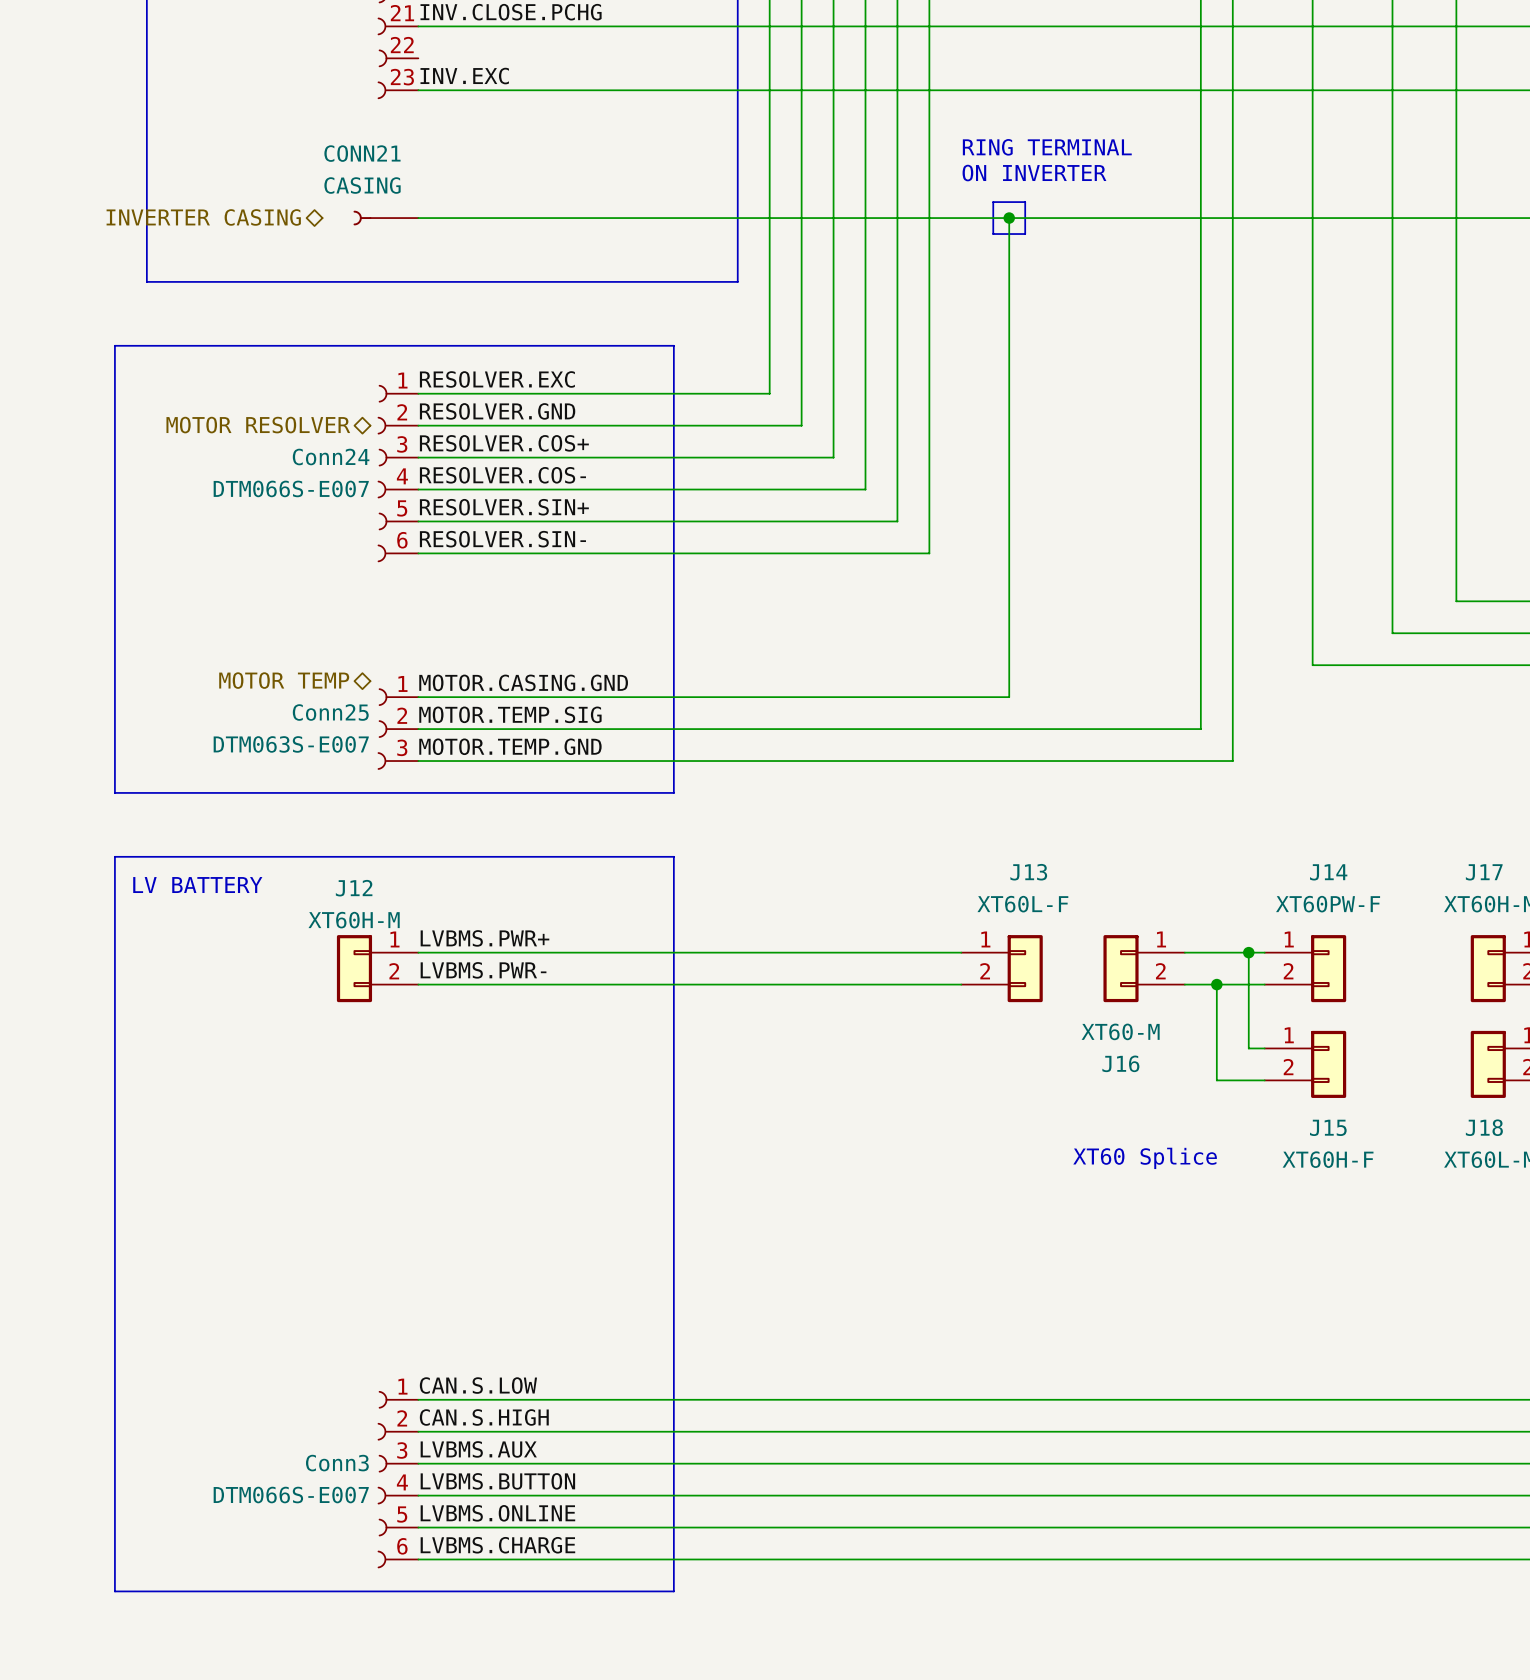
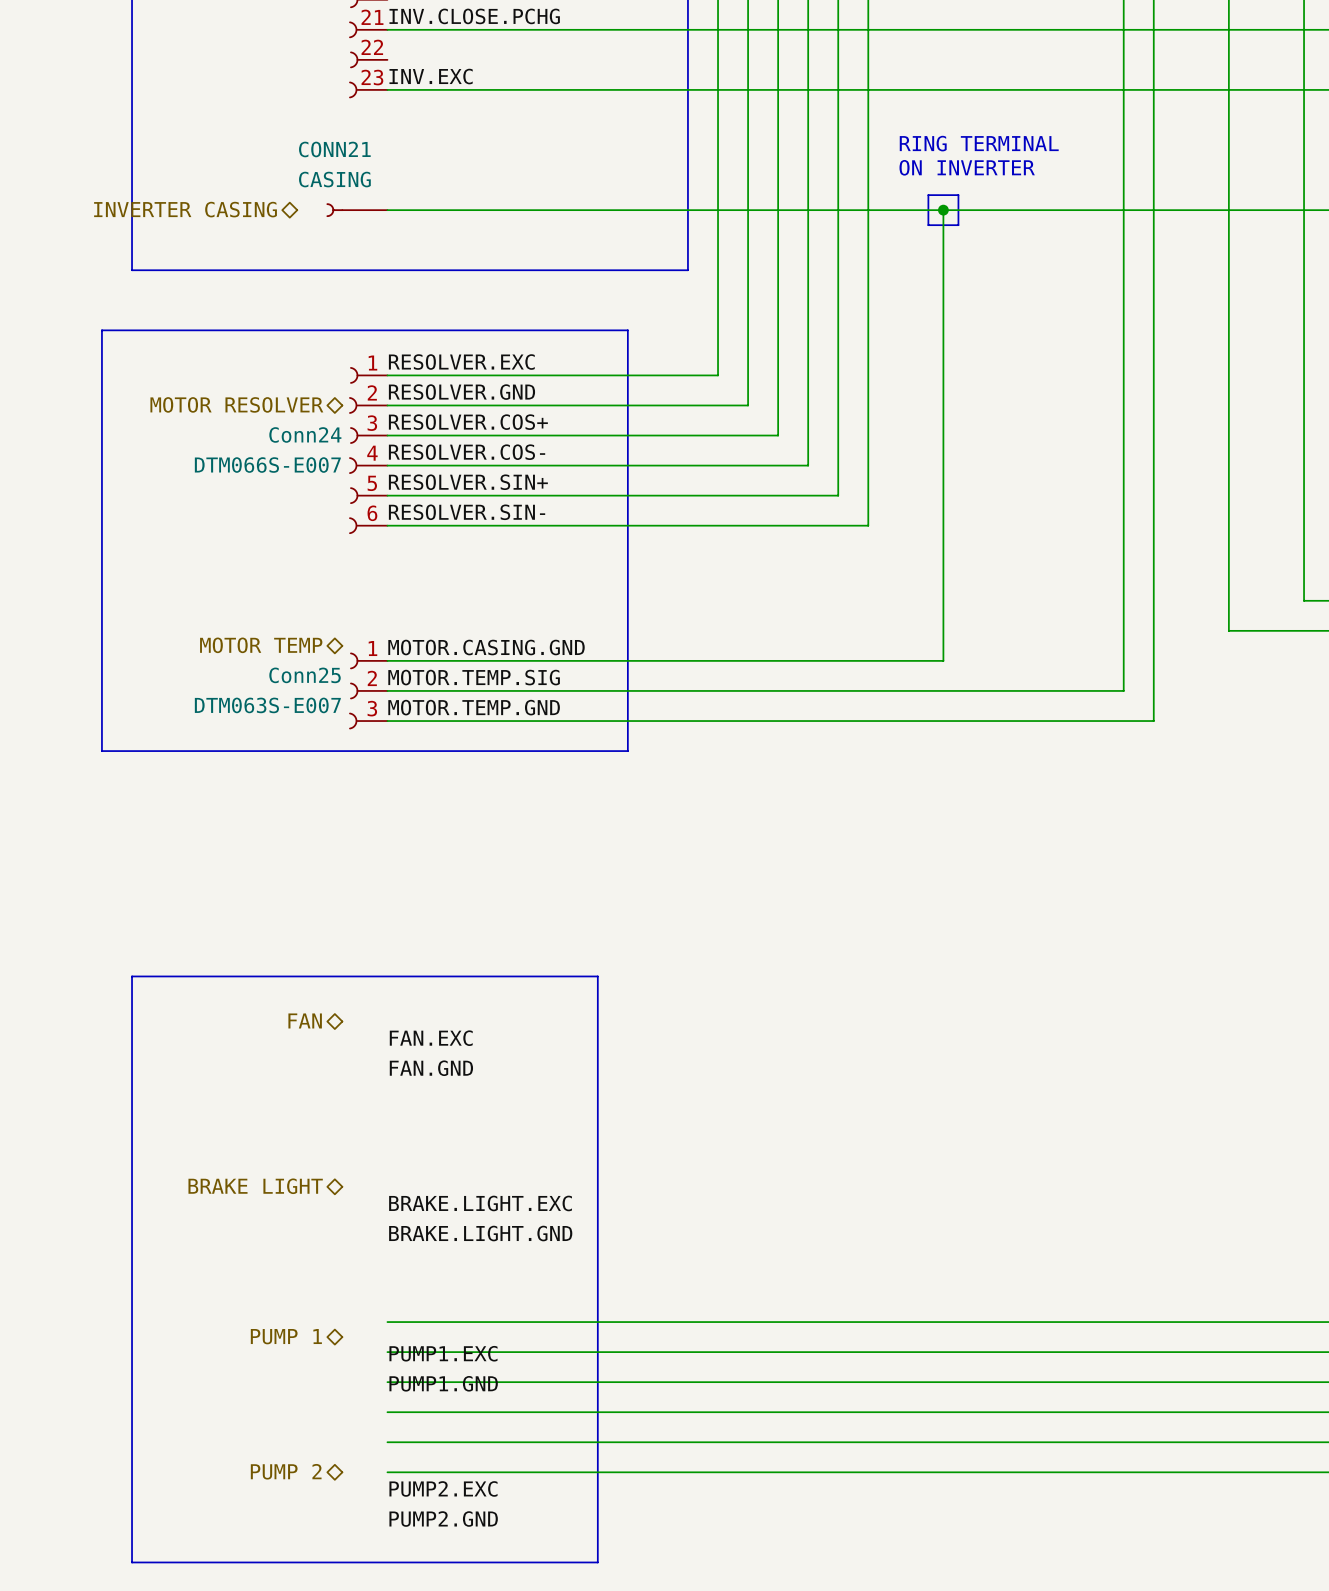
line: (114, 856) (114, 1591) (673, 1591) (673, 856) (114, 856) -> (132, 976) (132, 1562) (597, 1562) (597, 976) (132, 976)
text: LV BATTERY (197, 885) -> none
label: LVBMS.PWR+ (484, 938) -> none
wire: (418, 952) (961, 952) -> none
wire: (1184, 952) (1264, 952) -> none
wire: (1248, 952) (1248, 1048) (1264, 1048) -> none
junction: (1248, 952) -> none
J12: XT60H-M (377, 968) -> none
J13: XT60L-F (1002, 968) -> none
J16: XT60-M (1144, 968) -> none
J14: XT60PW-F (1305, 968) -> none
label: LVBMS.PWR- (483, 970) -> none
wire: (418, 984) (961, 984) -> none
wire: (1184, 984) (1264, 984) -> none
wire: (1216, 984) (1216, 1080) (1264, 1080) -> none
junction: (1216, 984) -> none
J15: XT60H-F (1305, 1064) -> none
hierarchical label: none -> FAN (305, 1020)
label: none -> FAN.EXC (431, 1038)
label: none -> FAN.GND (431, 1068)
text: XT60 Splice (1145, 1158) -> none
hierarchical label: none -> BRAKE LIGHT (255, 1186)
label: none -> BRAKE.LIGHT.EXC (480, 1203)
label: none -> BRAKE.LIGHT.GND (480, 1233)
label: CAN.S.LOW (478, 1385) -> none
hierarchical label: none -> PUMP 1 (286, 1336)
label: CAN.S.HIGH (484, 1417) -> none
label: none -> PUMP1.EXC (443, 1353)
label: LVBMS.AUX (478, 1449) -> none
label: none -> PUMP1.GND (443, 1383)
Conn3: (398, 1479) -> none
label: LVBMS.BUTTON (497, 1481) -> none
label: LVBMS.ONLINE (497, 1513) -> none
label: LVBMS.CHARGE (497, 1545) -> none
hierarchical label: none -> PUMP 2 (286, 1471)
label: none -> PUMP2.EXC (443, 1488)
label: none -> PUMP2.GND (443, 1519)

